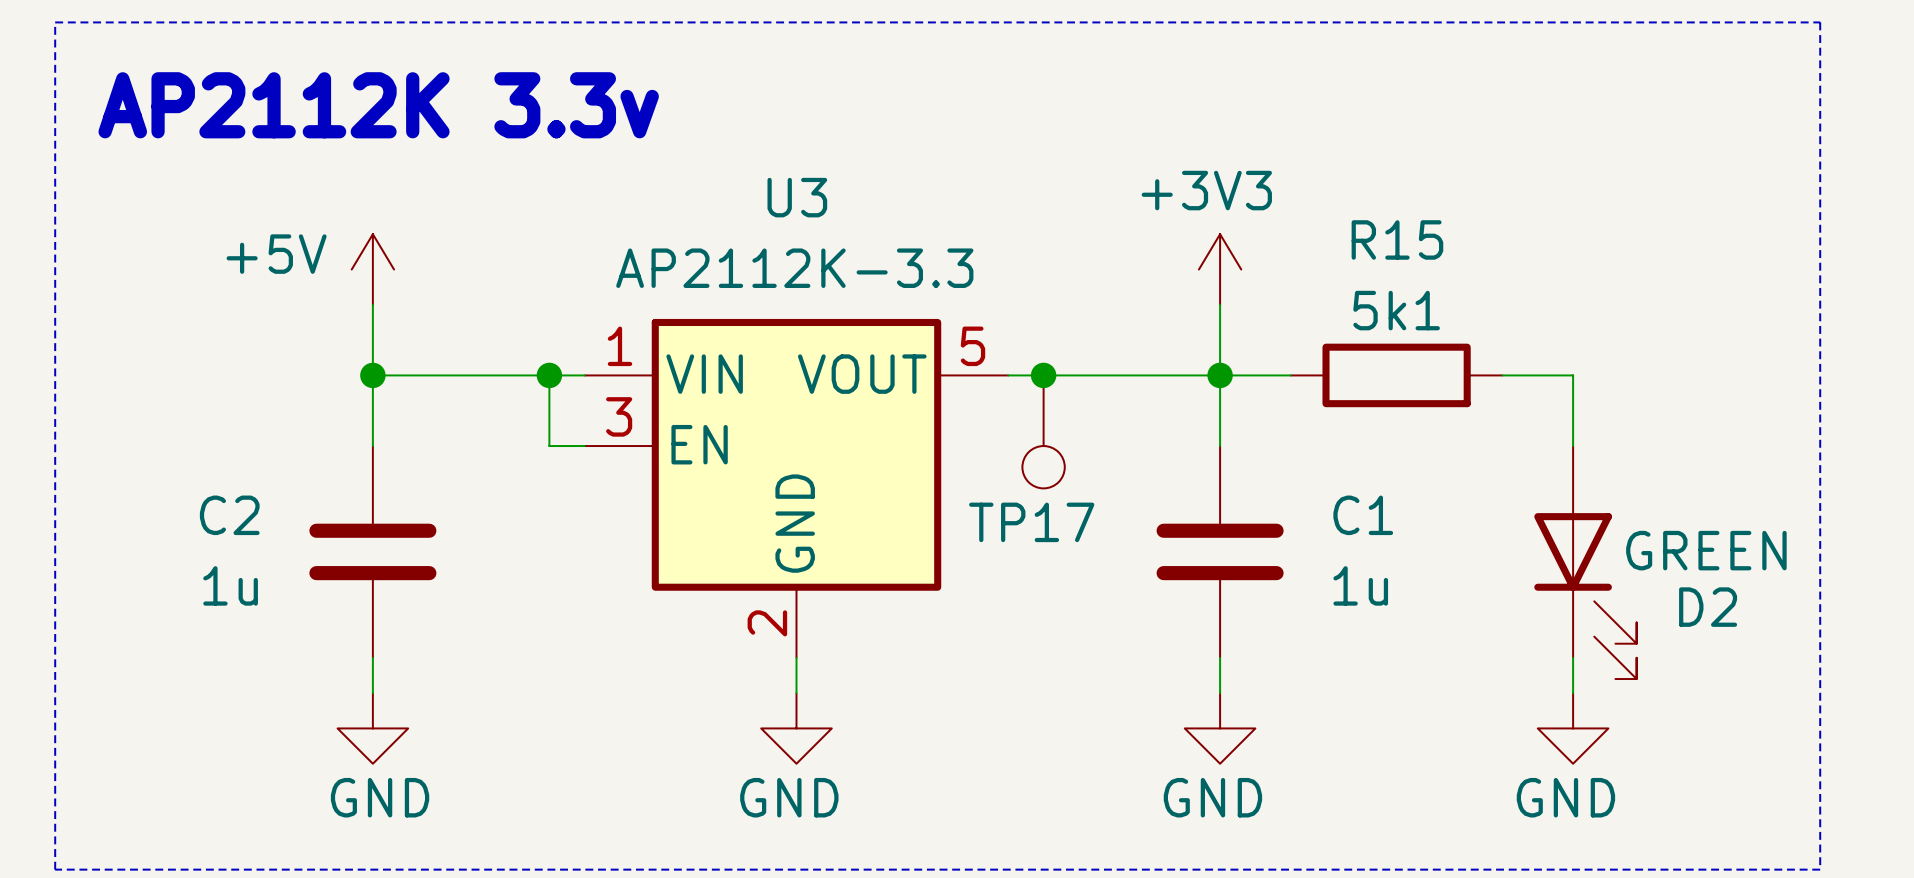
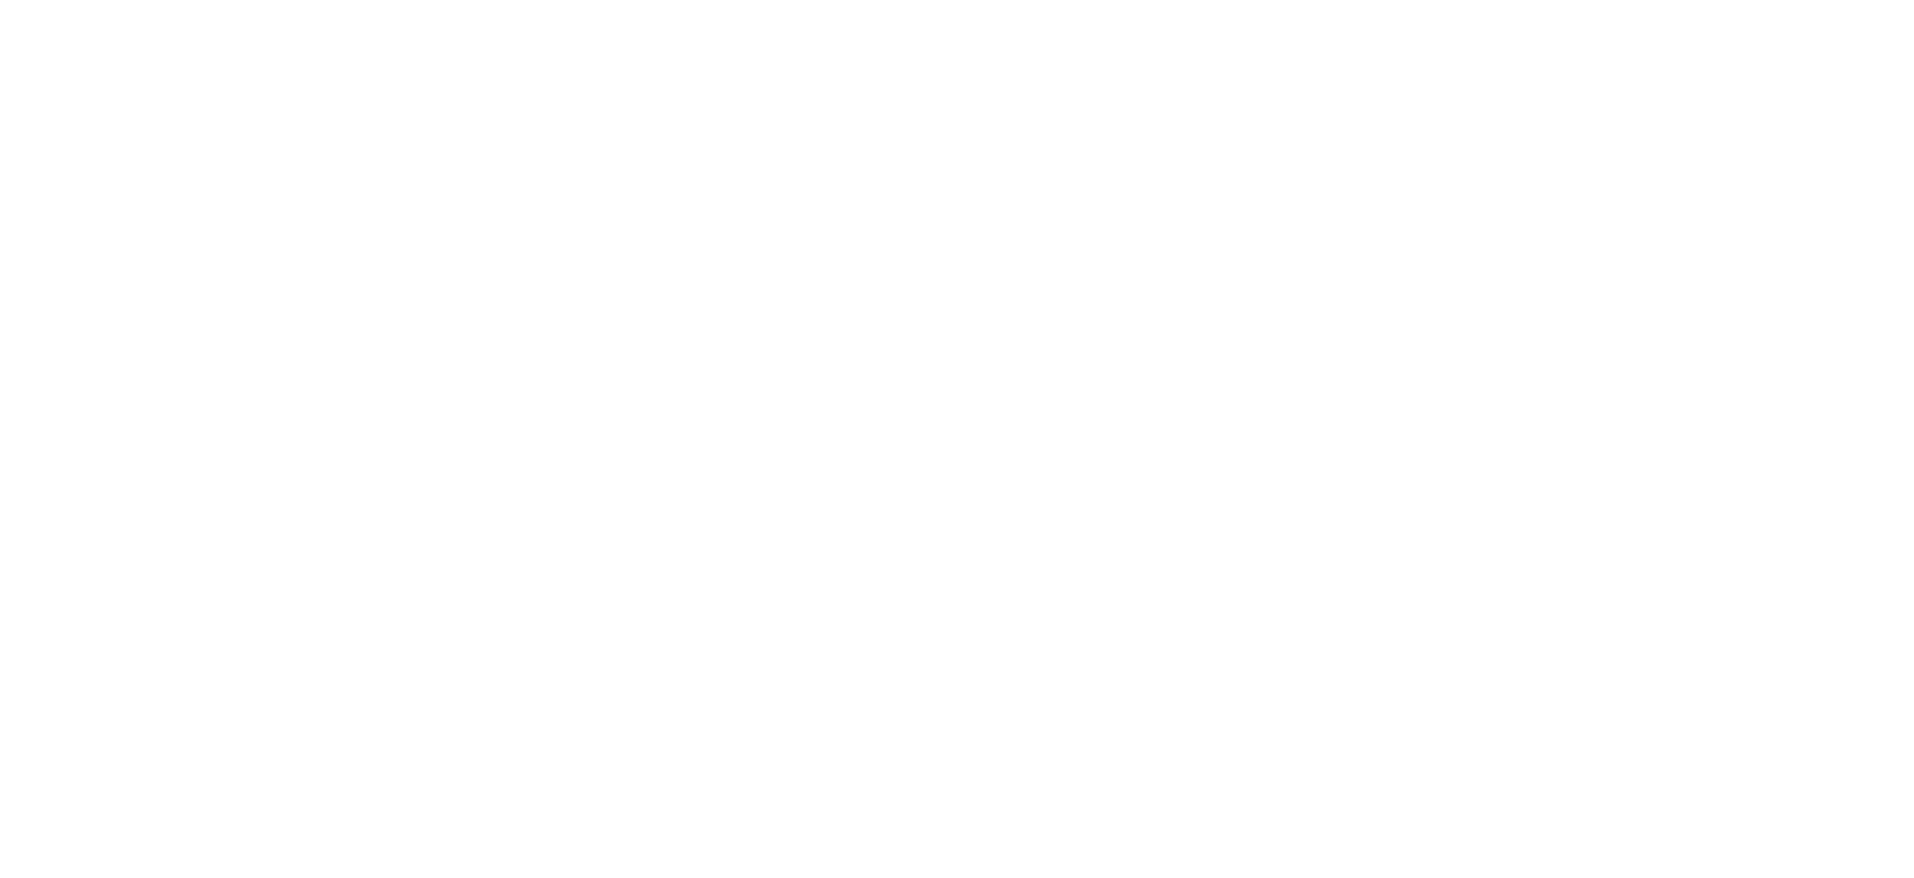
line: (55, 22) (1820, 22) (1820, 869) (55, 869) (55, 22) -> none
text: AP2112K 3.3v (378, 105) -> none
power symbol: +5V (372, 269) -> none
power symbol: +3V3 (1220, 269) -> none
wire: (372, 304) (372, 446) -> none
wire: (1220, 304) (1220, 446) -> none
wire: (372, 375) (584, 375) -> none
junction: (372, 375) -> none
wire: (549, 375) (549, 446) (584, 446) -> none
junction: (549, 375) -> none
wire: (1008, 375) (1290, 375) -> none
junction: (1043, 375) -> none
junction: (1220, 375) -> none
R15: 5k1 (1396, 375) -> none
wire: (1502, 375) (1573, 375) (1573, 446) -> none
TP17: (1043, 431) -> none
U3: AP2112K-3.3 (796, 488) -> none
C2: 1u (372, 551) -> none
C1: 1u (1220, 551) -> none
D2: GREEN (1585, 562) -> none
wire: (372, 657) (372, 693) -> none
wire: (796, 657) (796, 693) -> none
wire: (1220, 657) (1220, 693) -> none
wire: (1573, 657) (1573, 693) -> none
power symbol: GND (372, 728) -> none
power symbol: GND (796, 728) -> none
power symbol: GND (1220, 728) -> none
power symbol: GND (1573, 728) -> none

